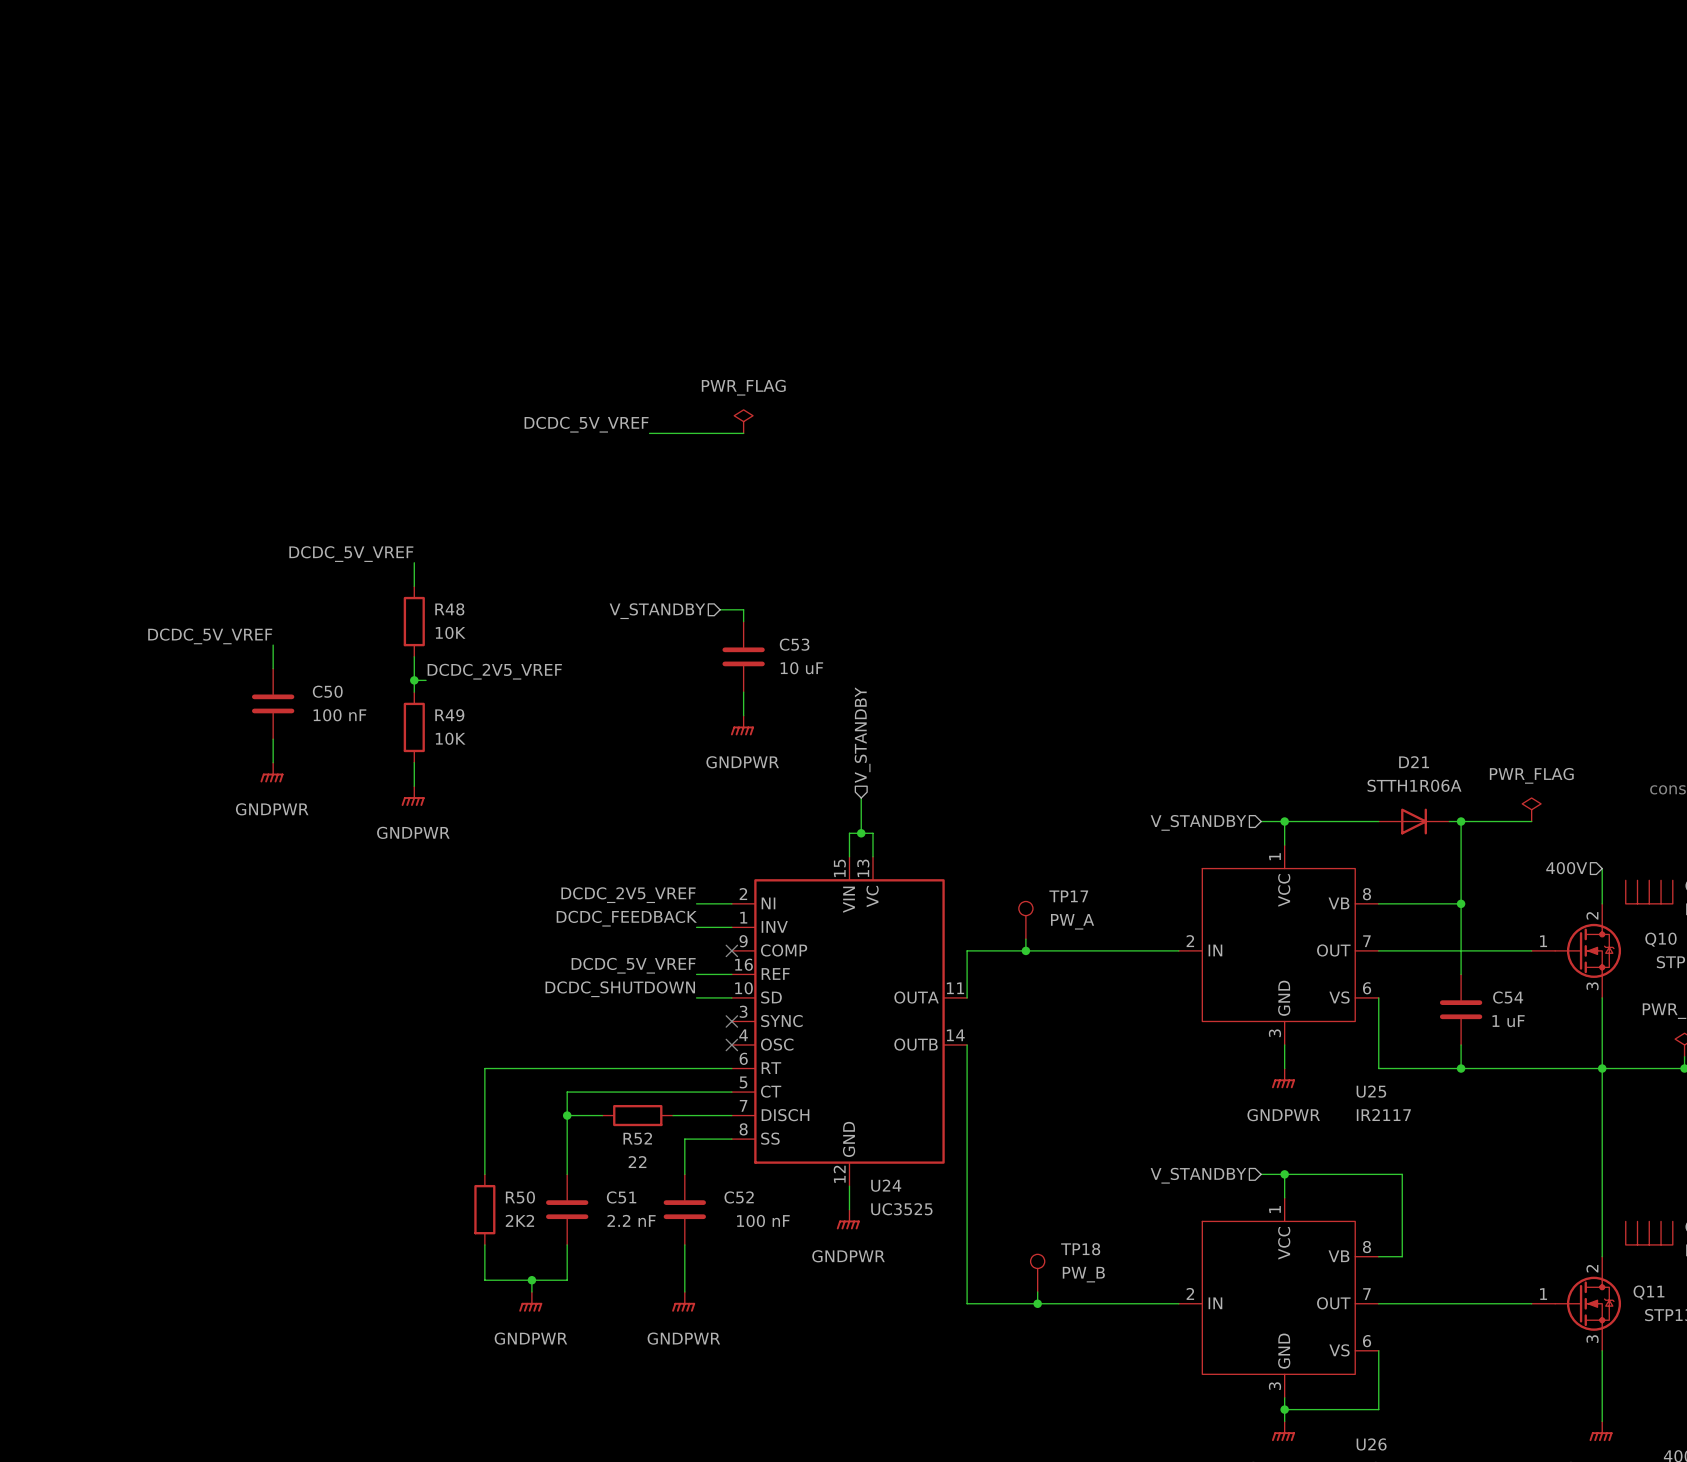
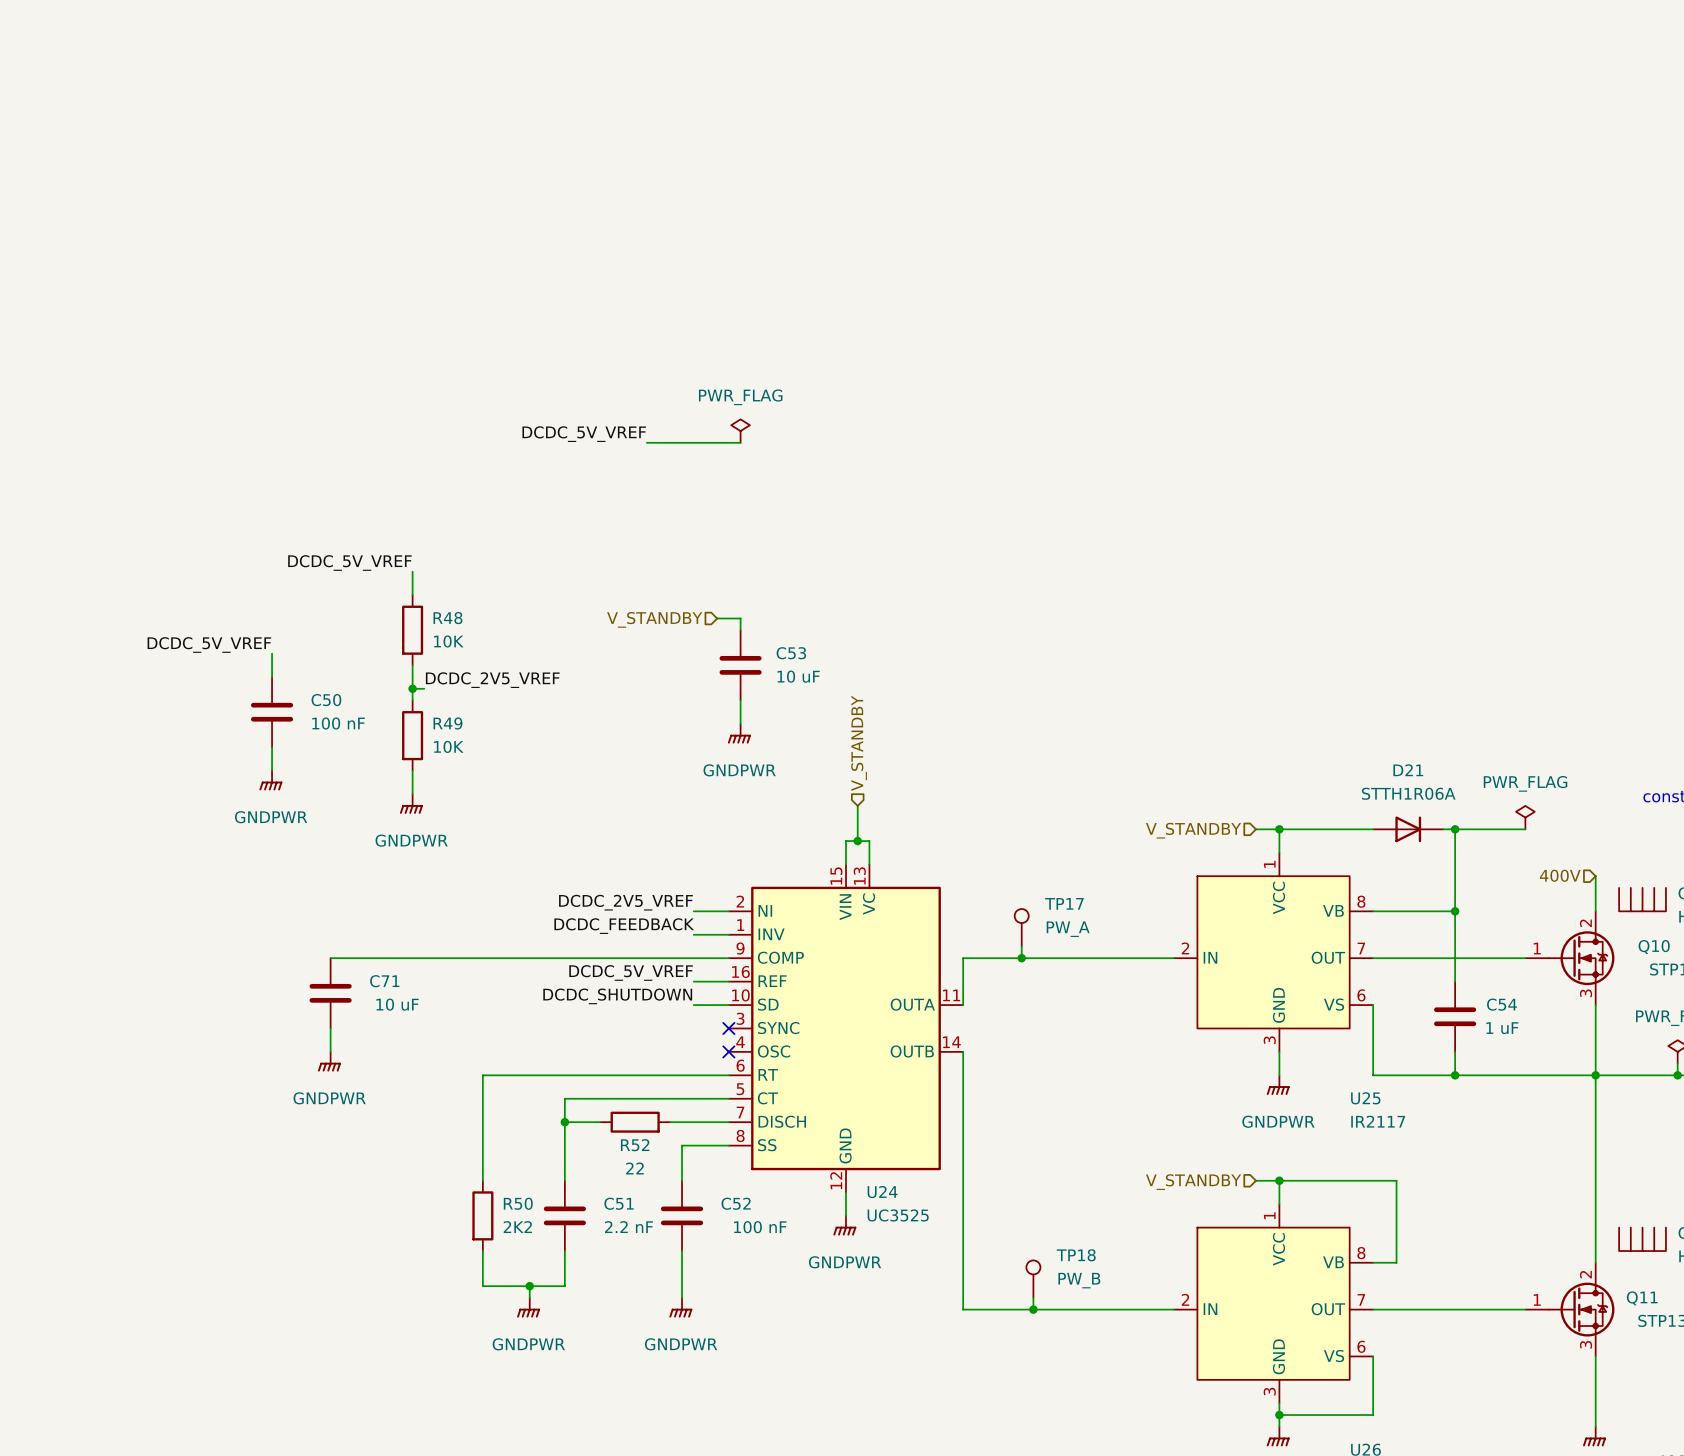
wire: none -> (330, 958) (728, 958)
no-connect mark: (731, 950) -> none
C71: none -> 10 uF (330, 993)
wire: none -> (330, 1028) (330, 1051)
power symbol: none -> GNDPWR (329, 1061)

